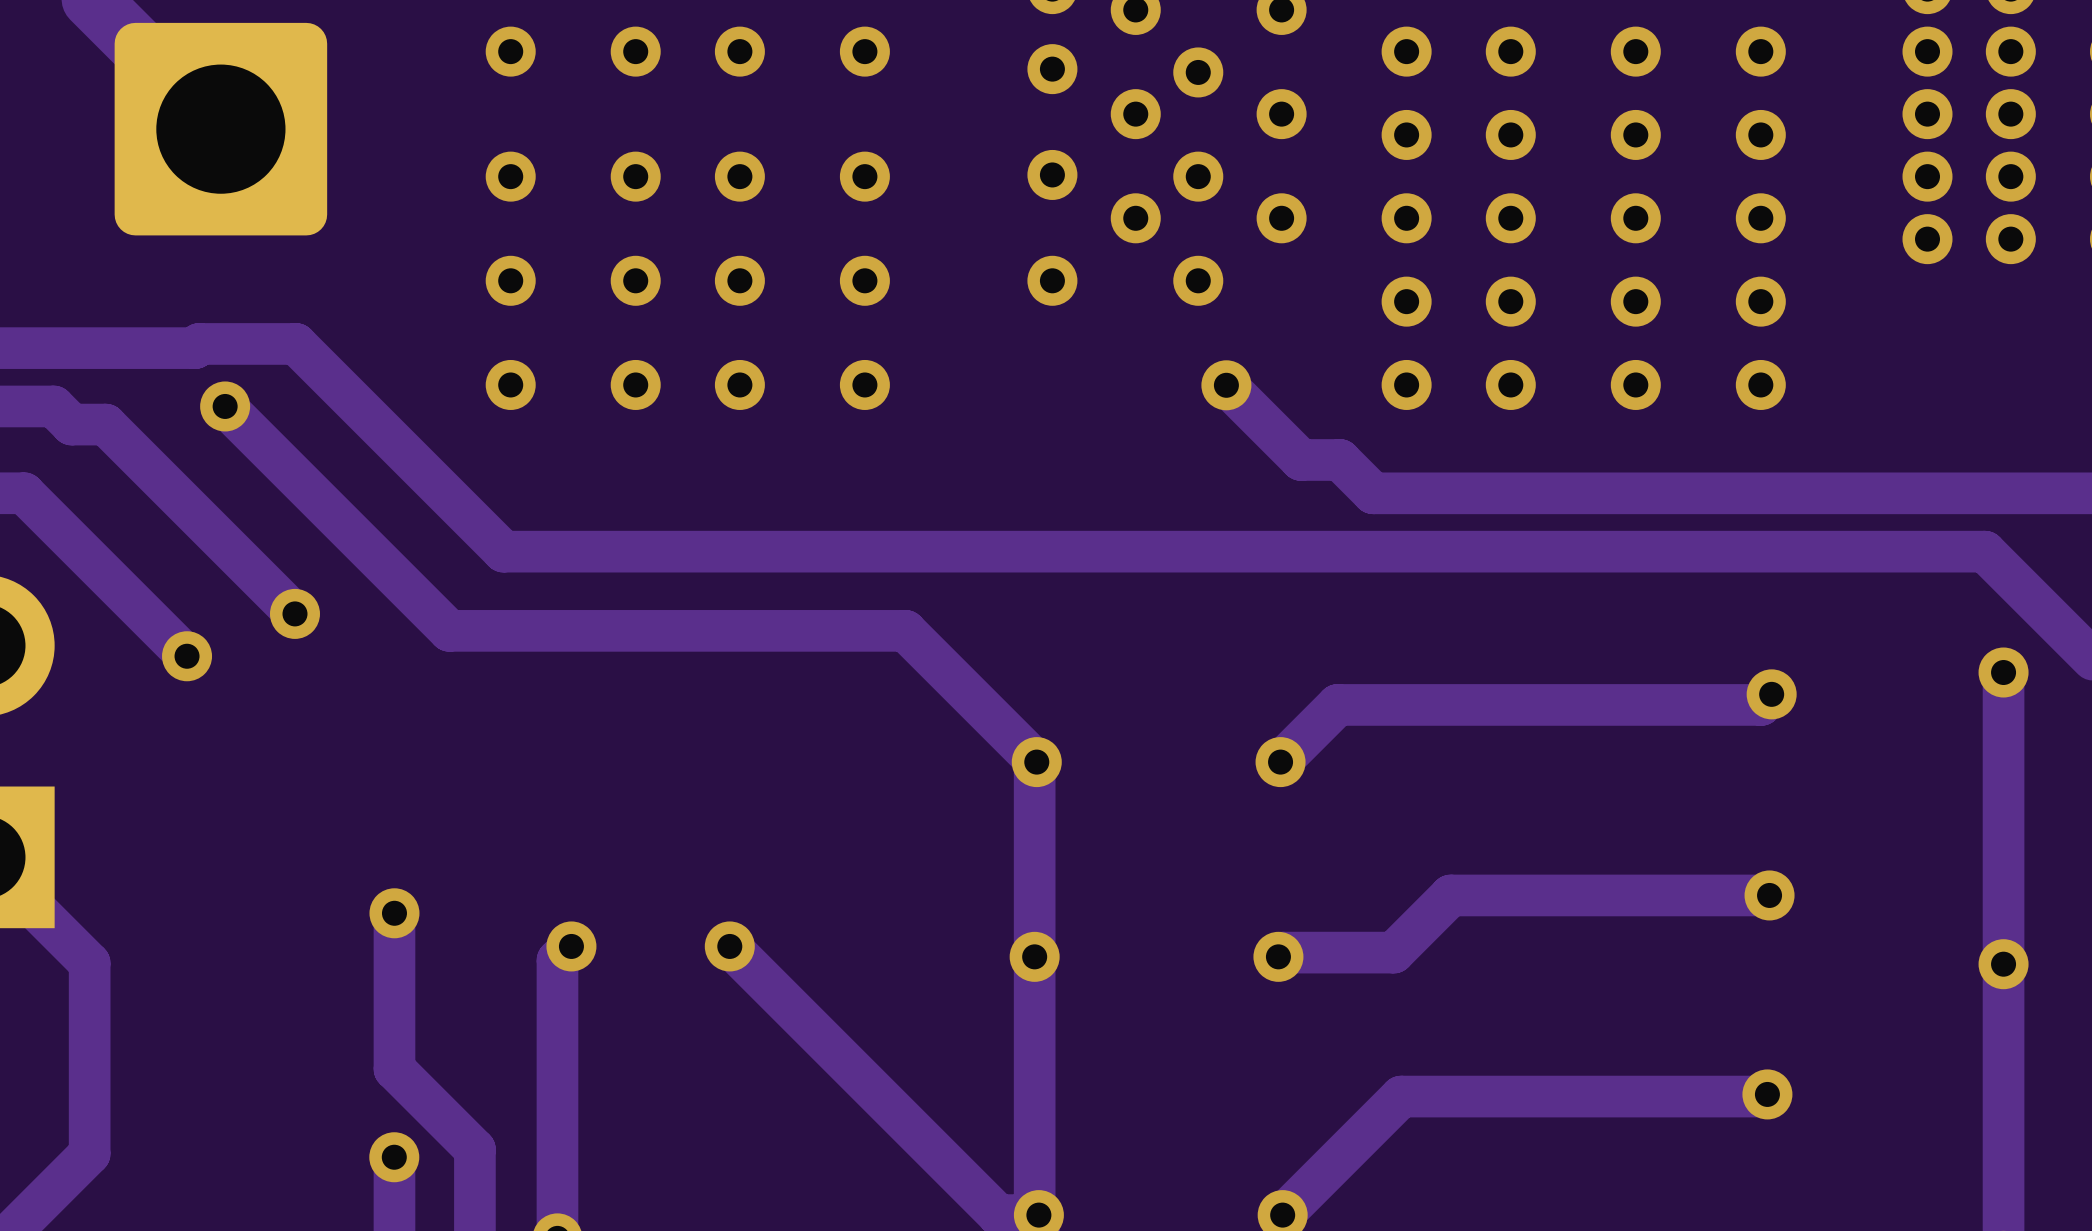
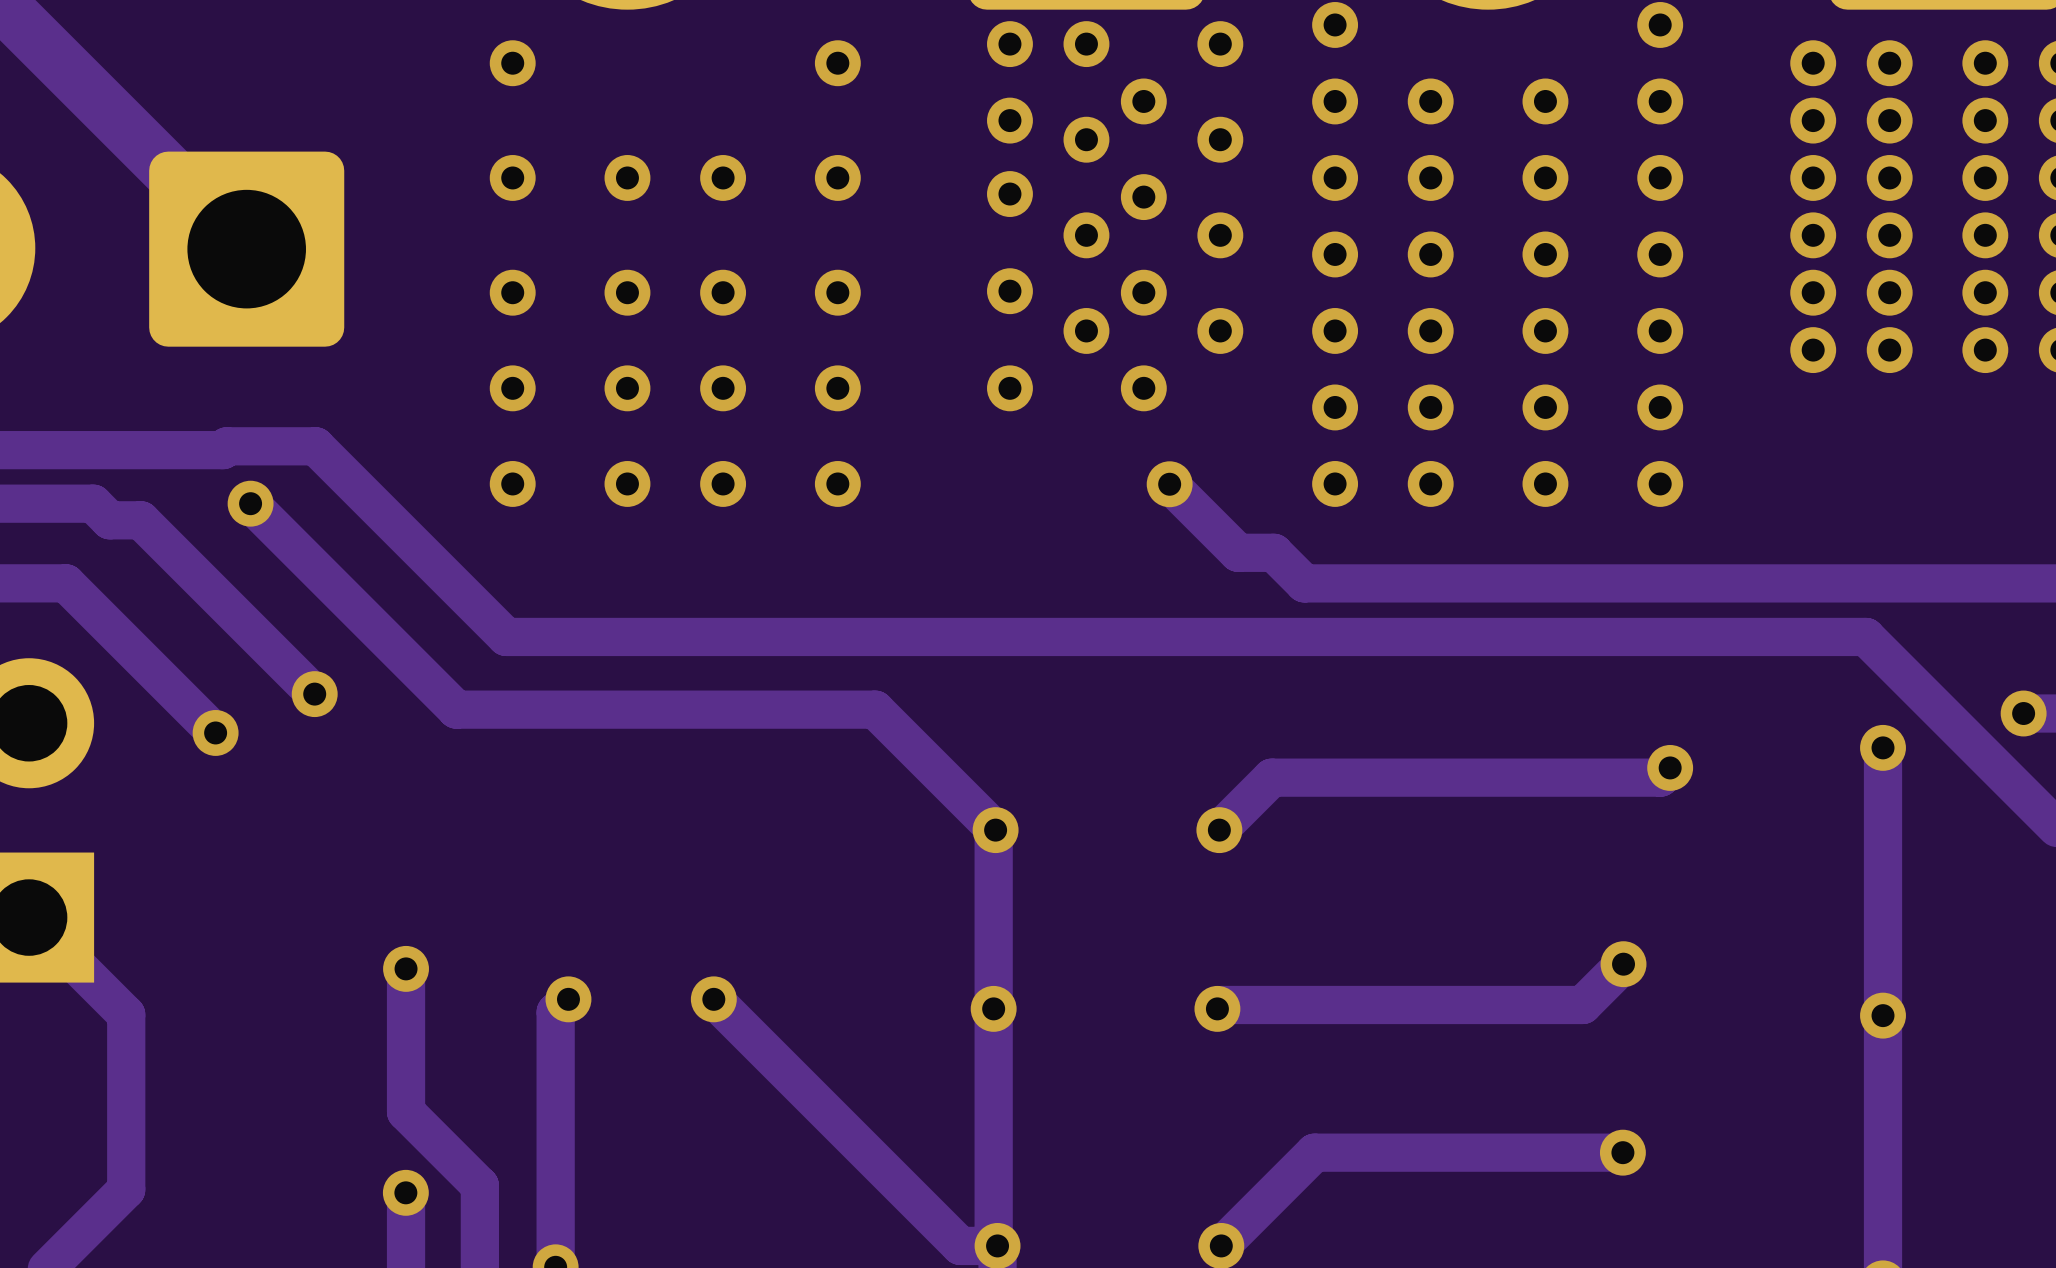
track: (1769, 895) (1450, 895) (1393, 952) -> (1623, 964) (1582, 1004) (1323, 1004)
via position: (1769, 895) -> (1623, 964)
track: (1767, 1094) (1765, 1096) (1401, 1096) (1384, 1113) -> (1622, 1152) (1314, 1152)
via position: (1767, 1094) -> (1622, 1152)

